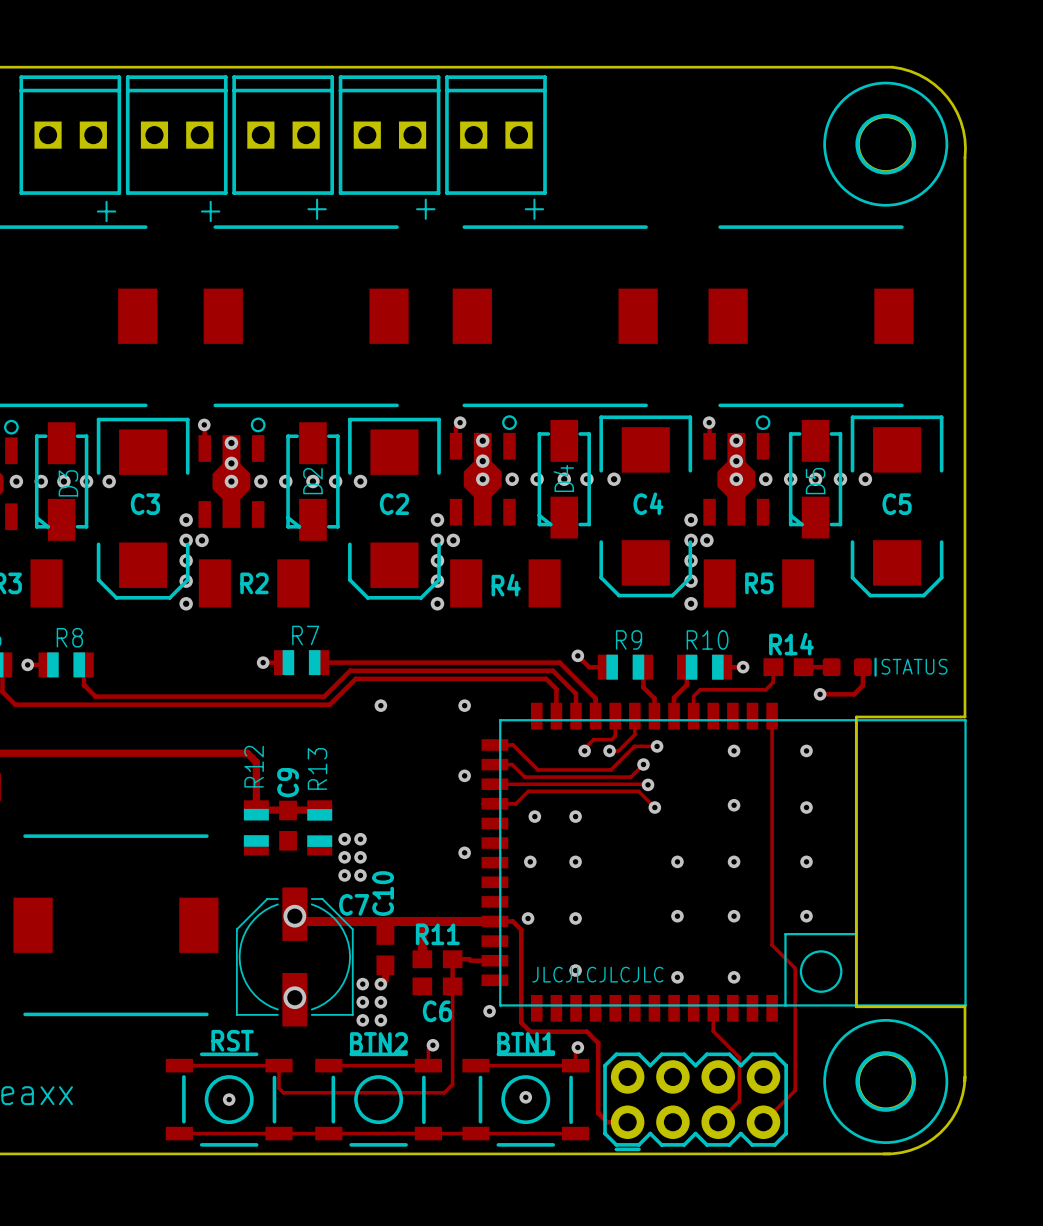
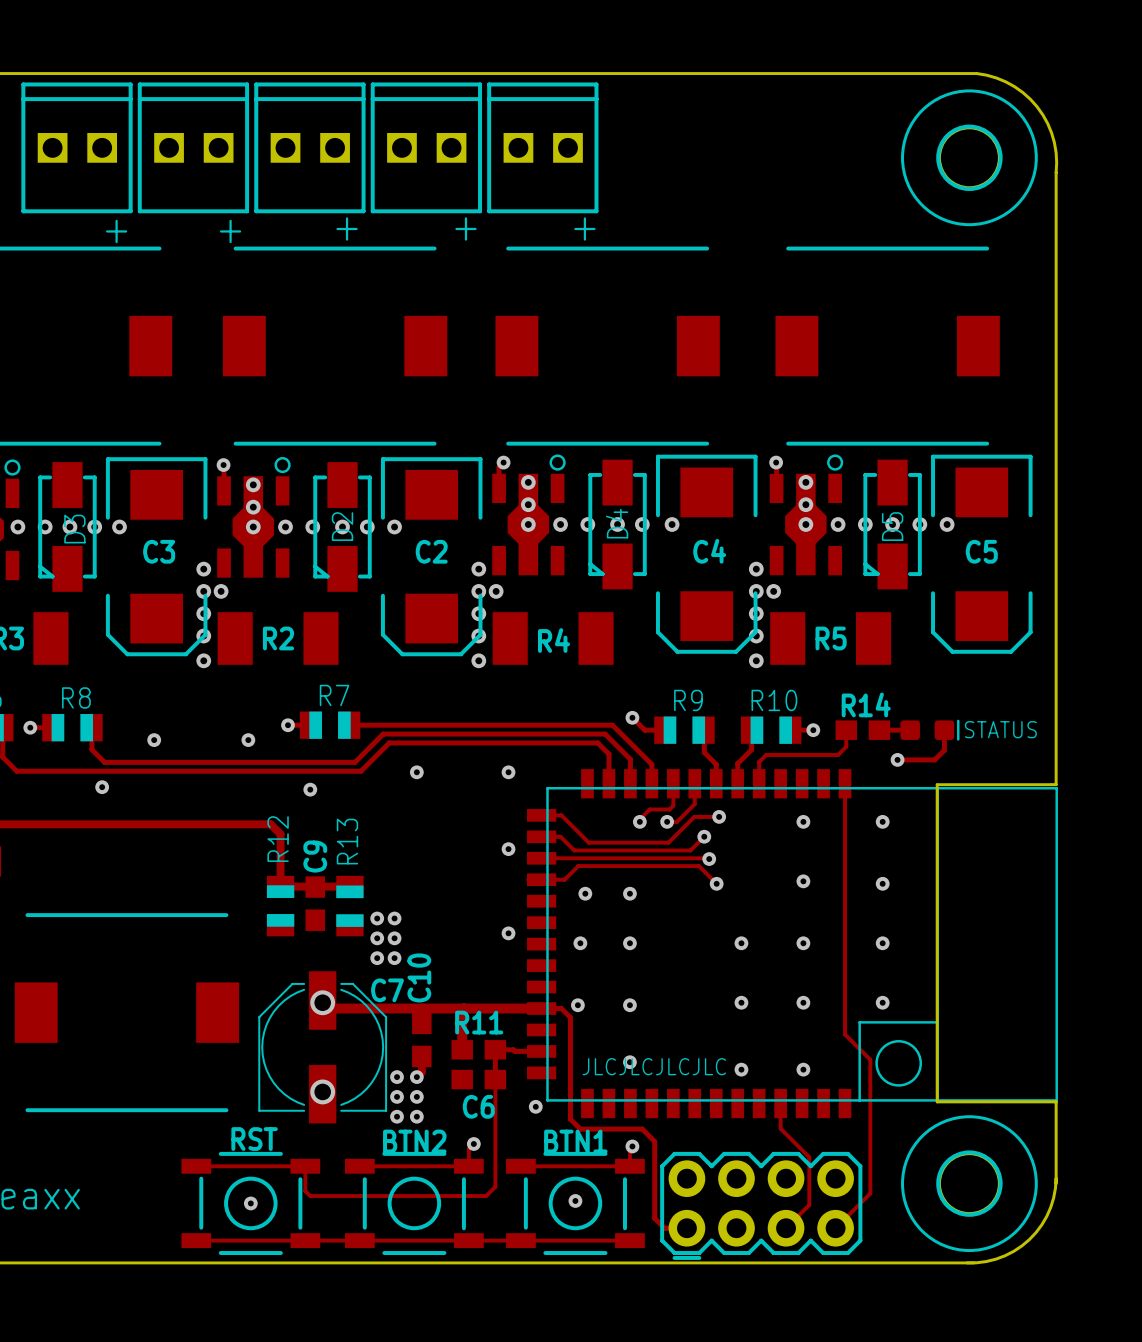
via: none -> (154, 740)
via: none -> (248, 740)
via: none -> (102, 787)
via: none -> (310, 789)

